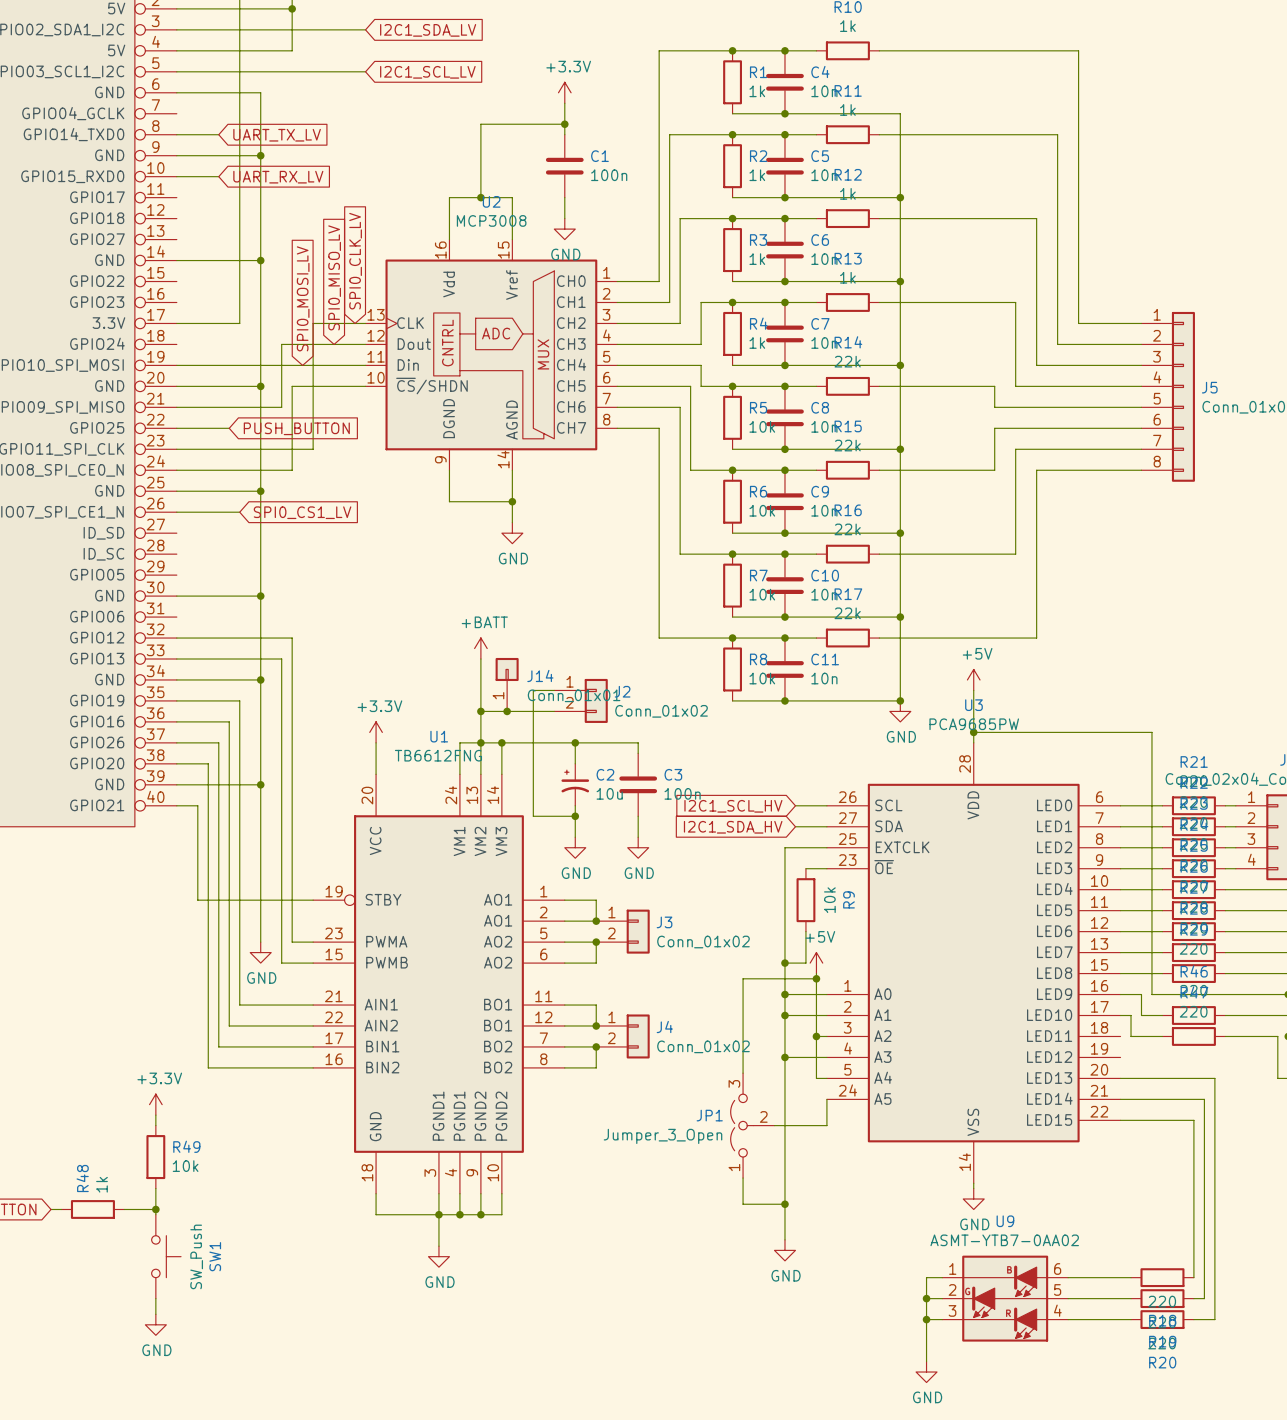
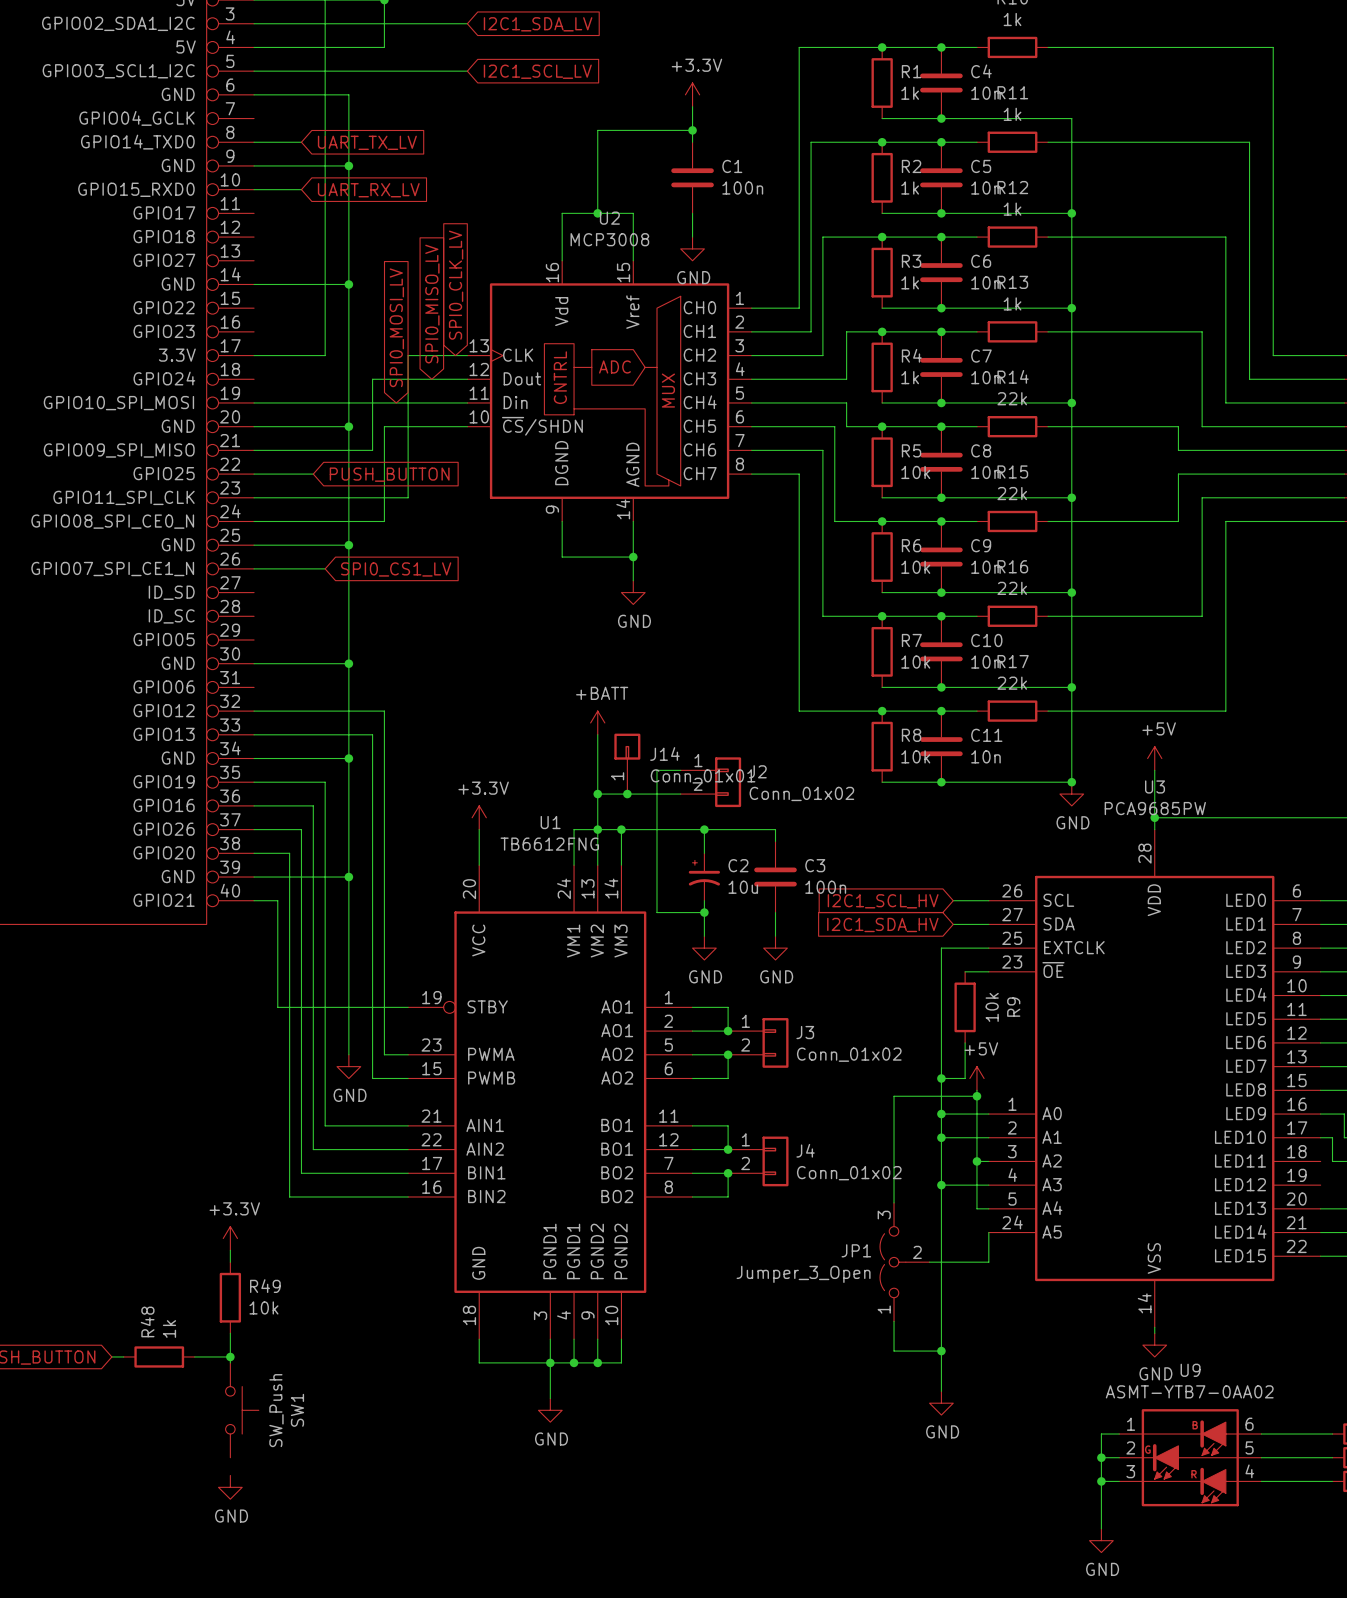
wire: (155, 1298) (155, 1314) -> none

